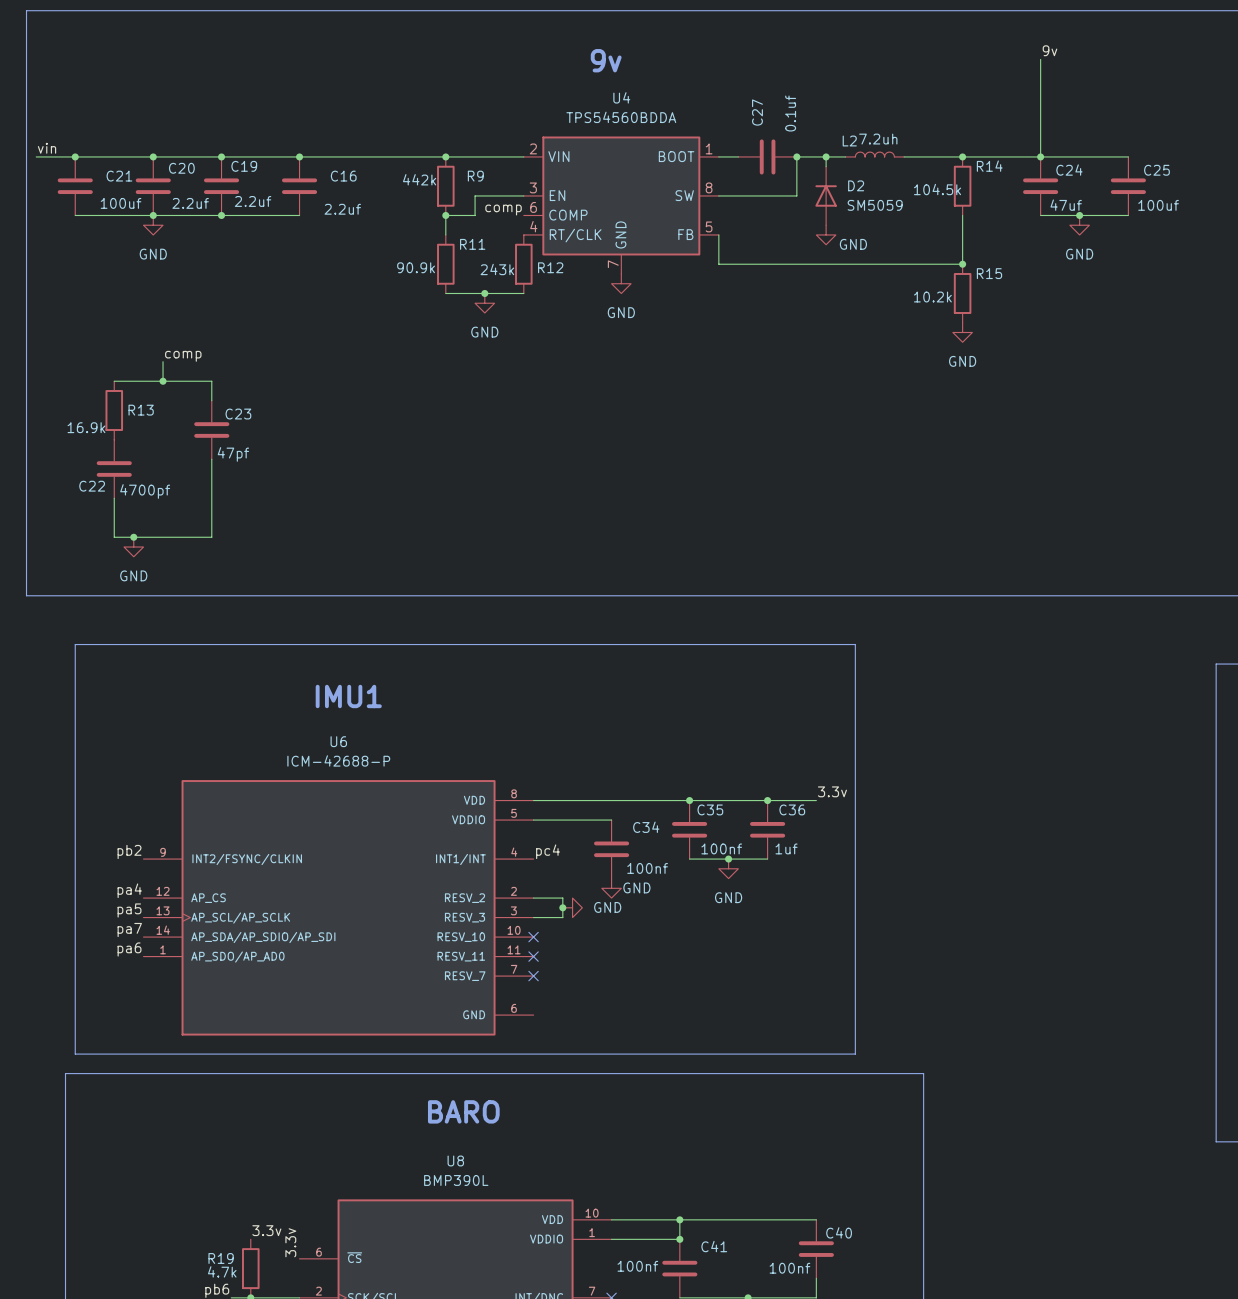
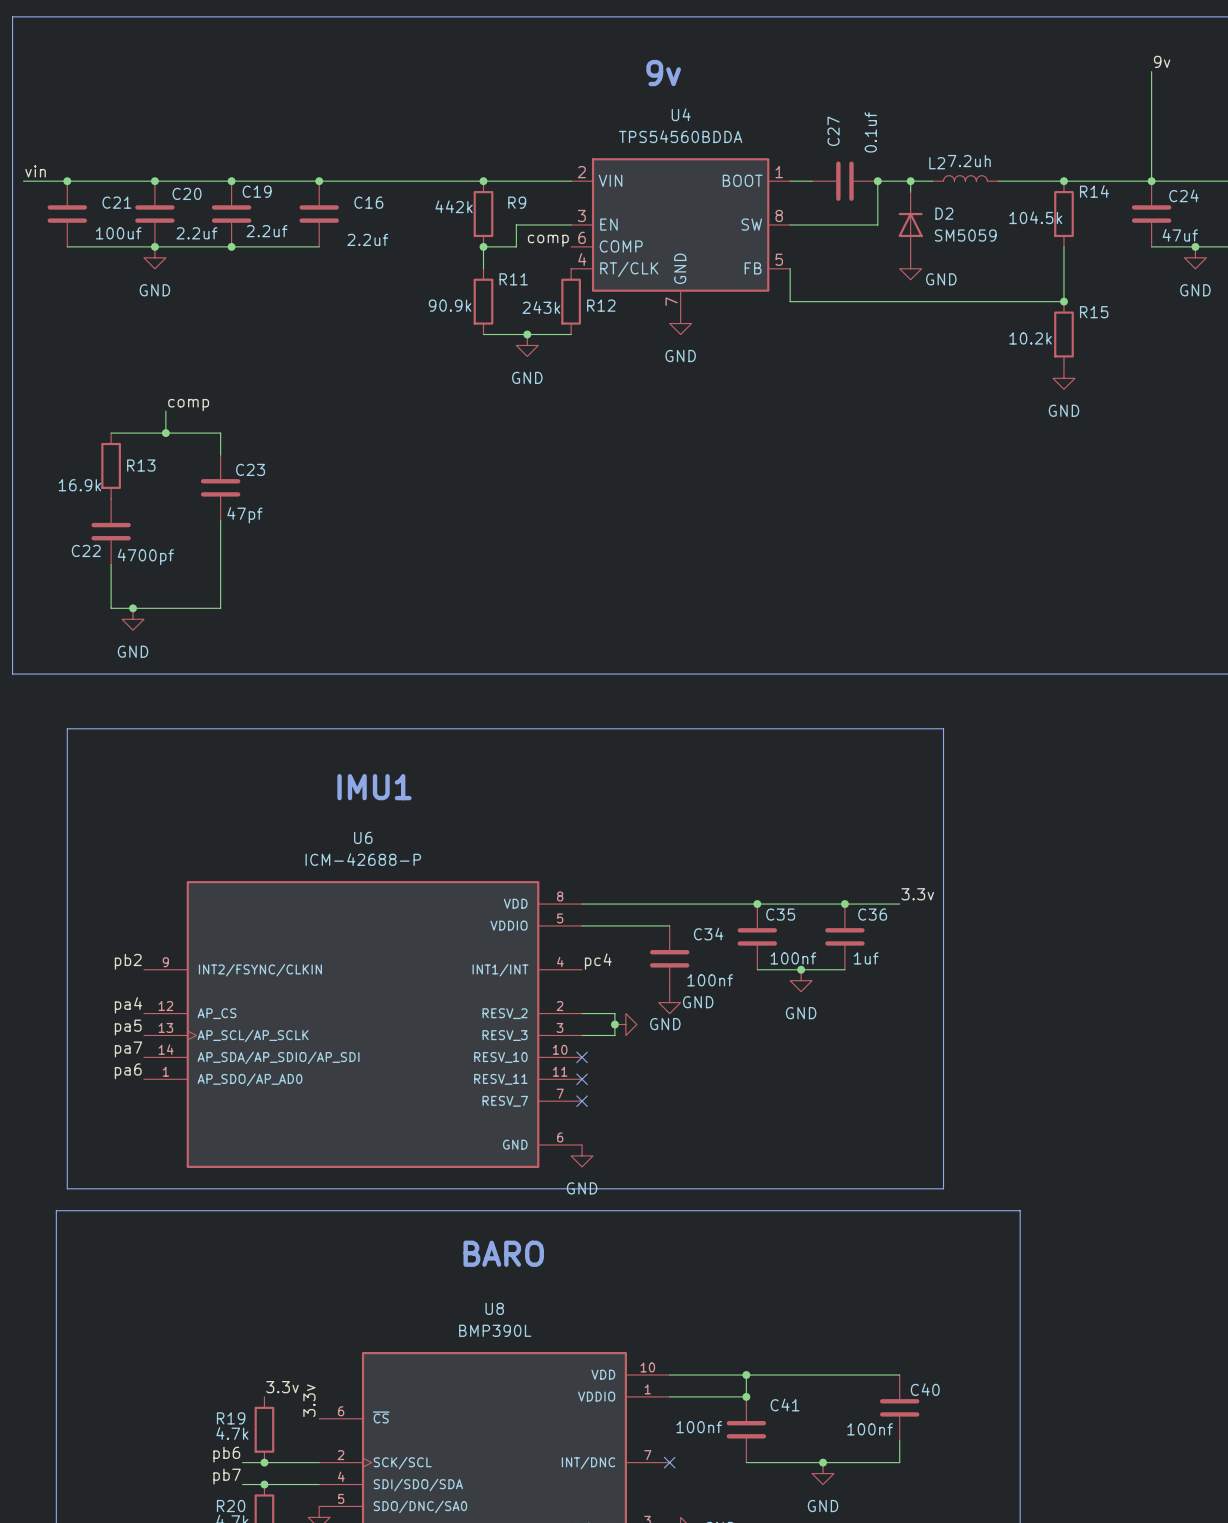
power symbol: none -> GND (582, 1155)

